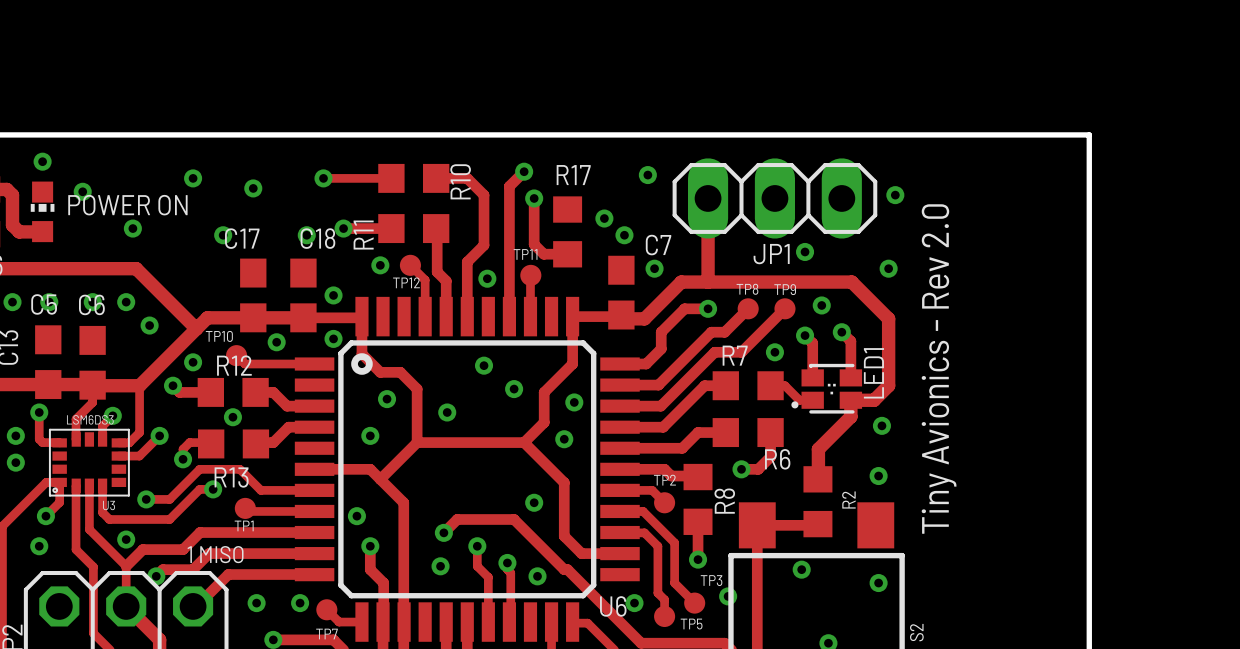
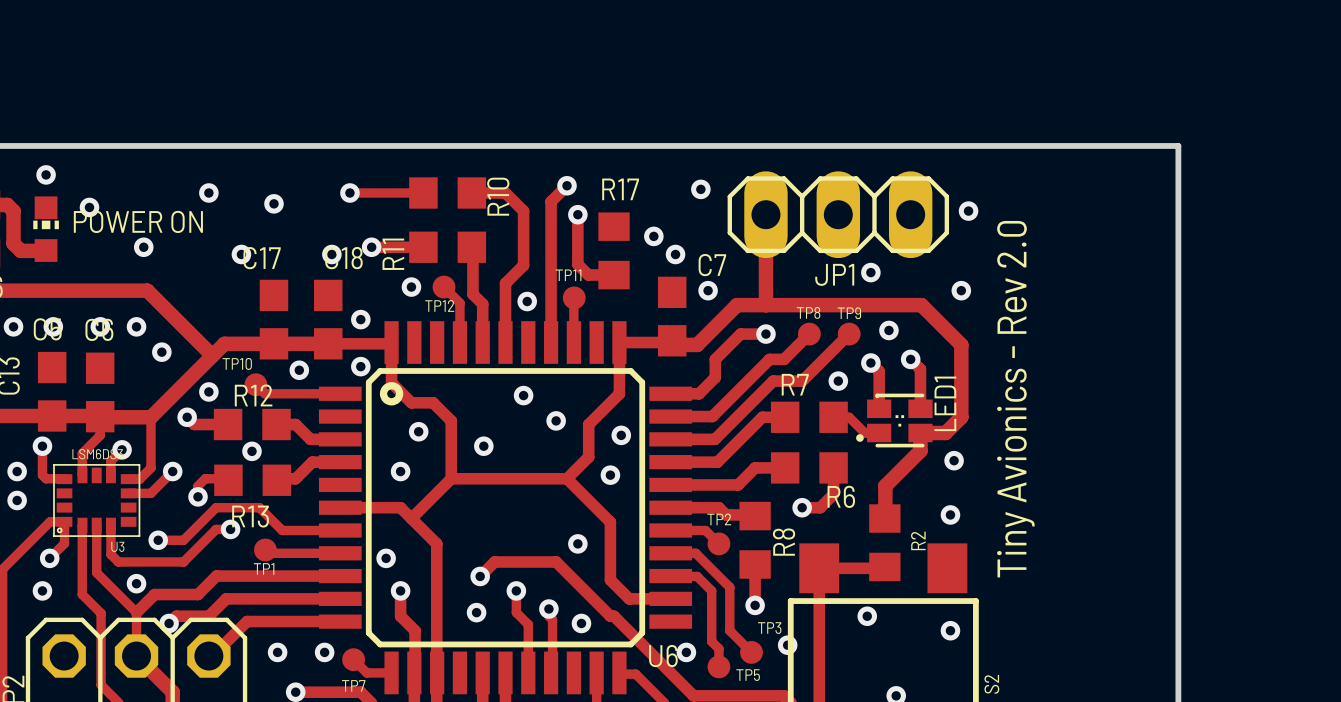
text: 1 MISO (215, 554) -> none

